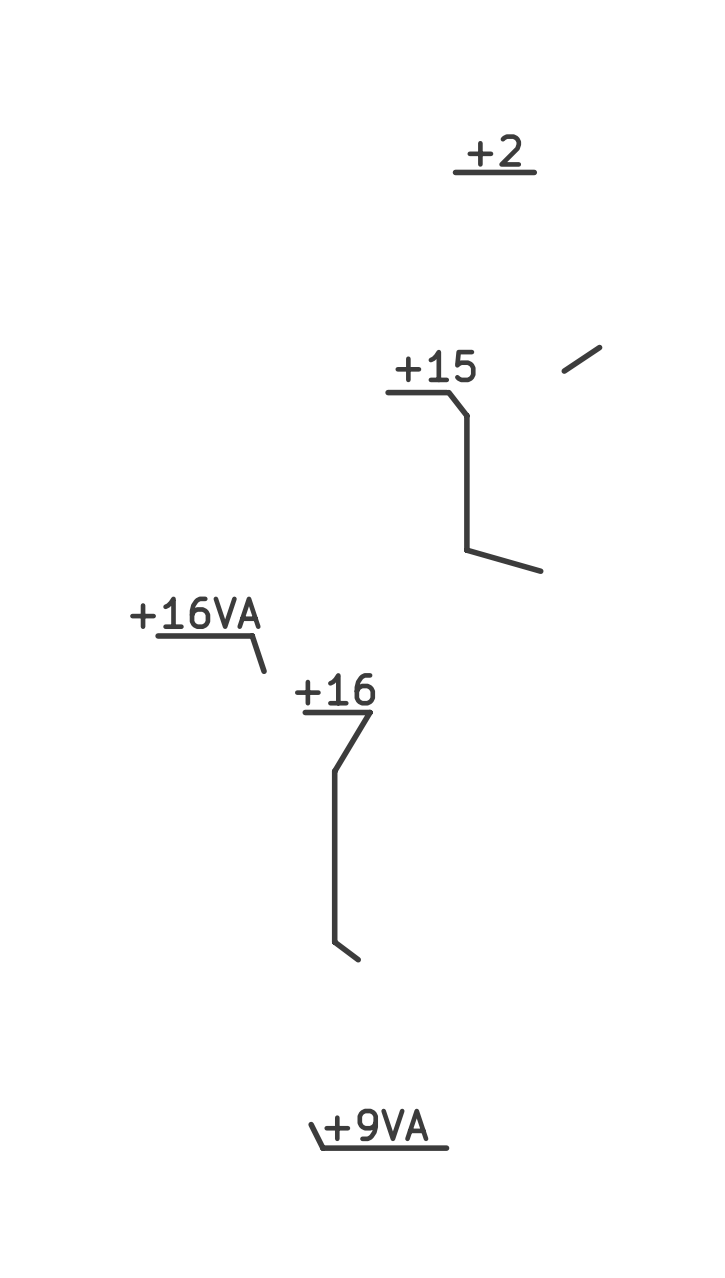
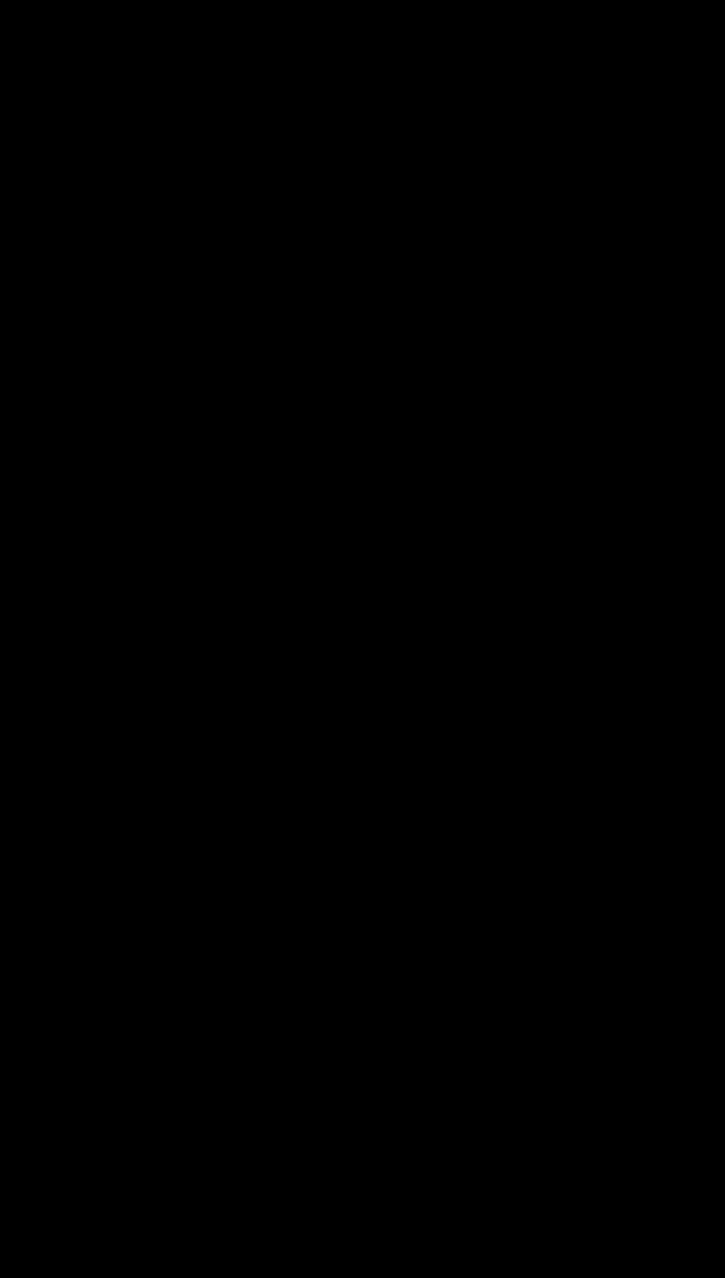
text: +2 (494, 150) -> none
line: (455, 172) (534, 172) -> none
line: (599, 347) (564, 371) -> none
text: +15 (435, 366) -> none
line: (388, 392) (446, 392) -> none
line: (448, 392) (466, 415) (466, 550) (540, 571) -> none
text: +16VA (195, 612) -> none
line: (158, 635) (252, 635) (264, 671) -> none
text: +16 (335, 689) -> none
line: (305, 712) (370, 712) (334, 771) (334, 942) (358, 959) -> none
line: (311, 1124) (322, 1148) (446, 1148) -> none
text: +9VA (376, 1124) -> none

